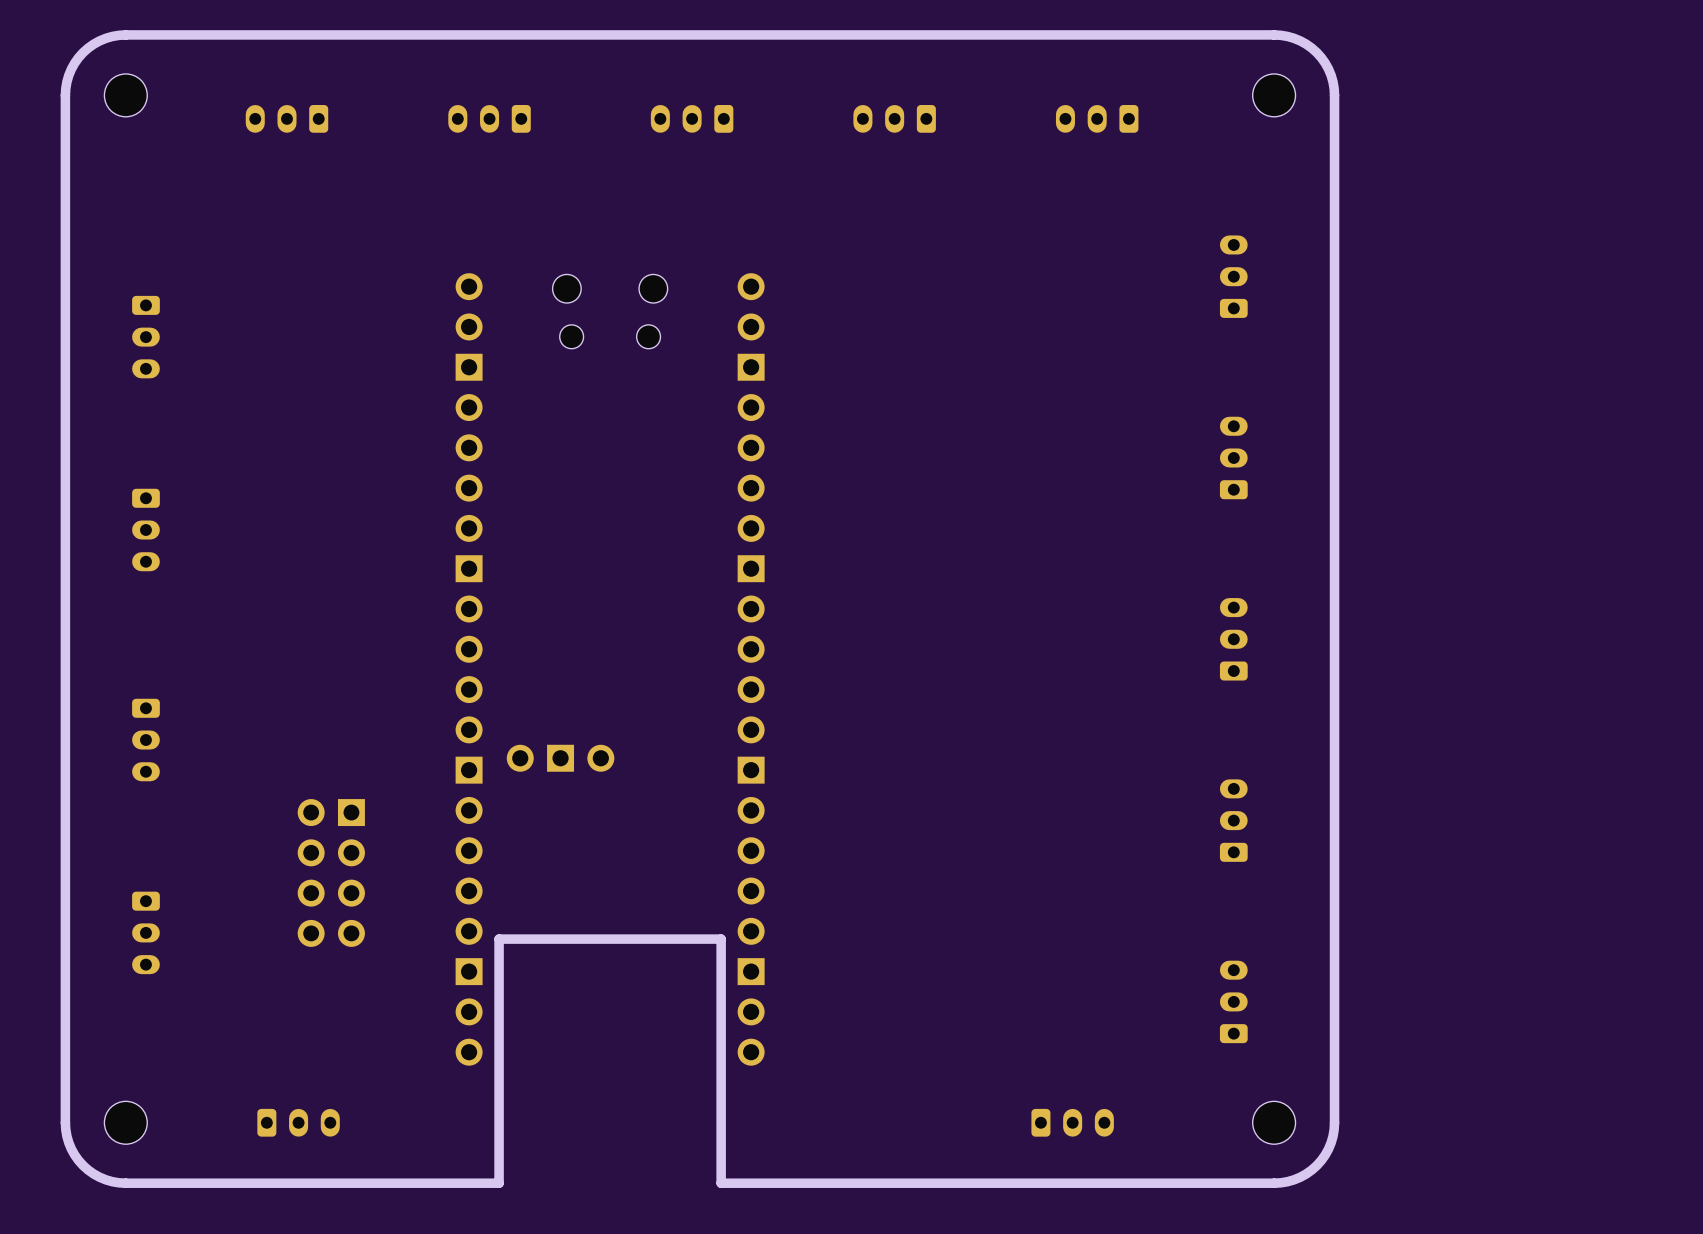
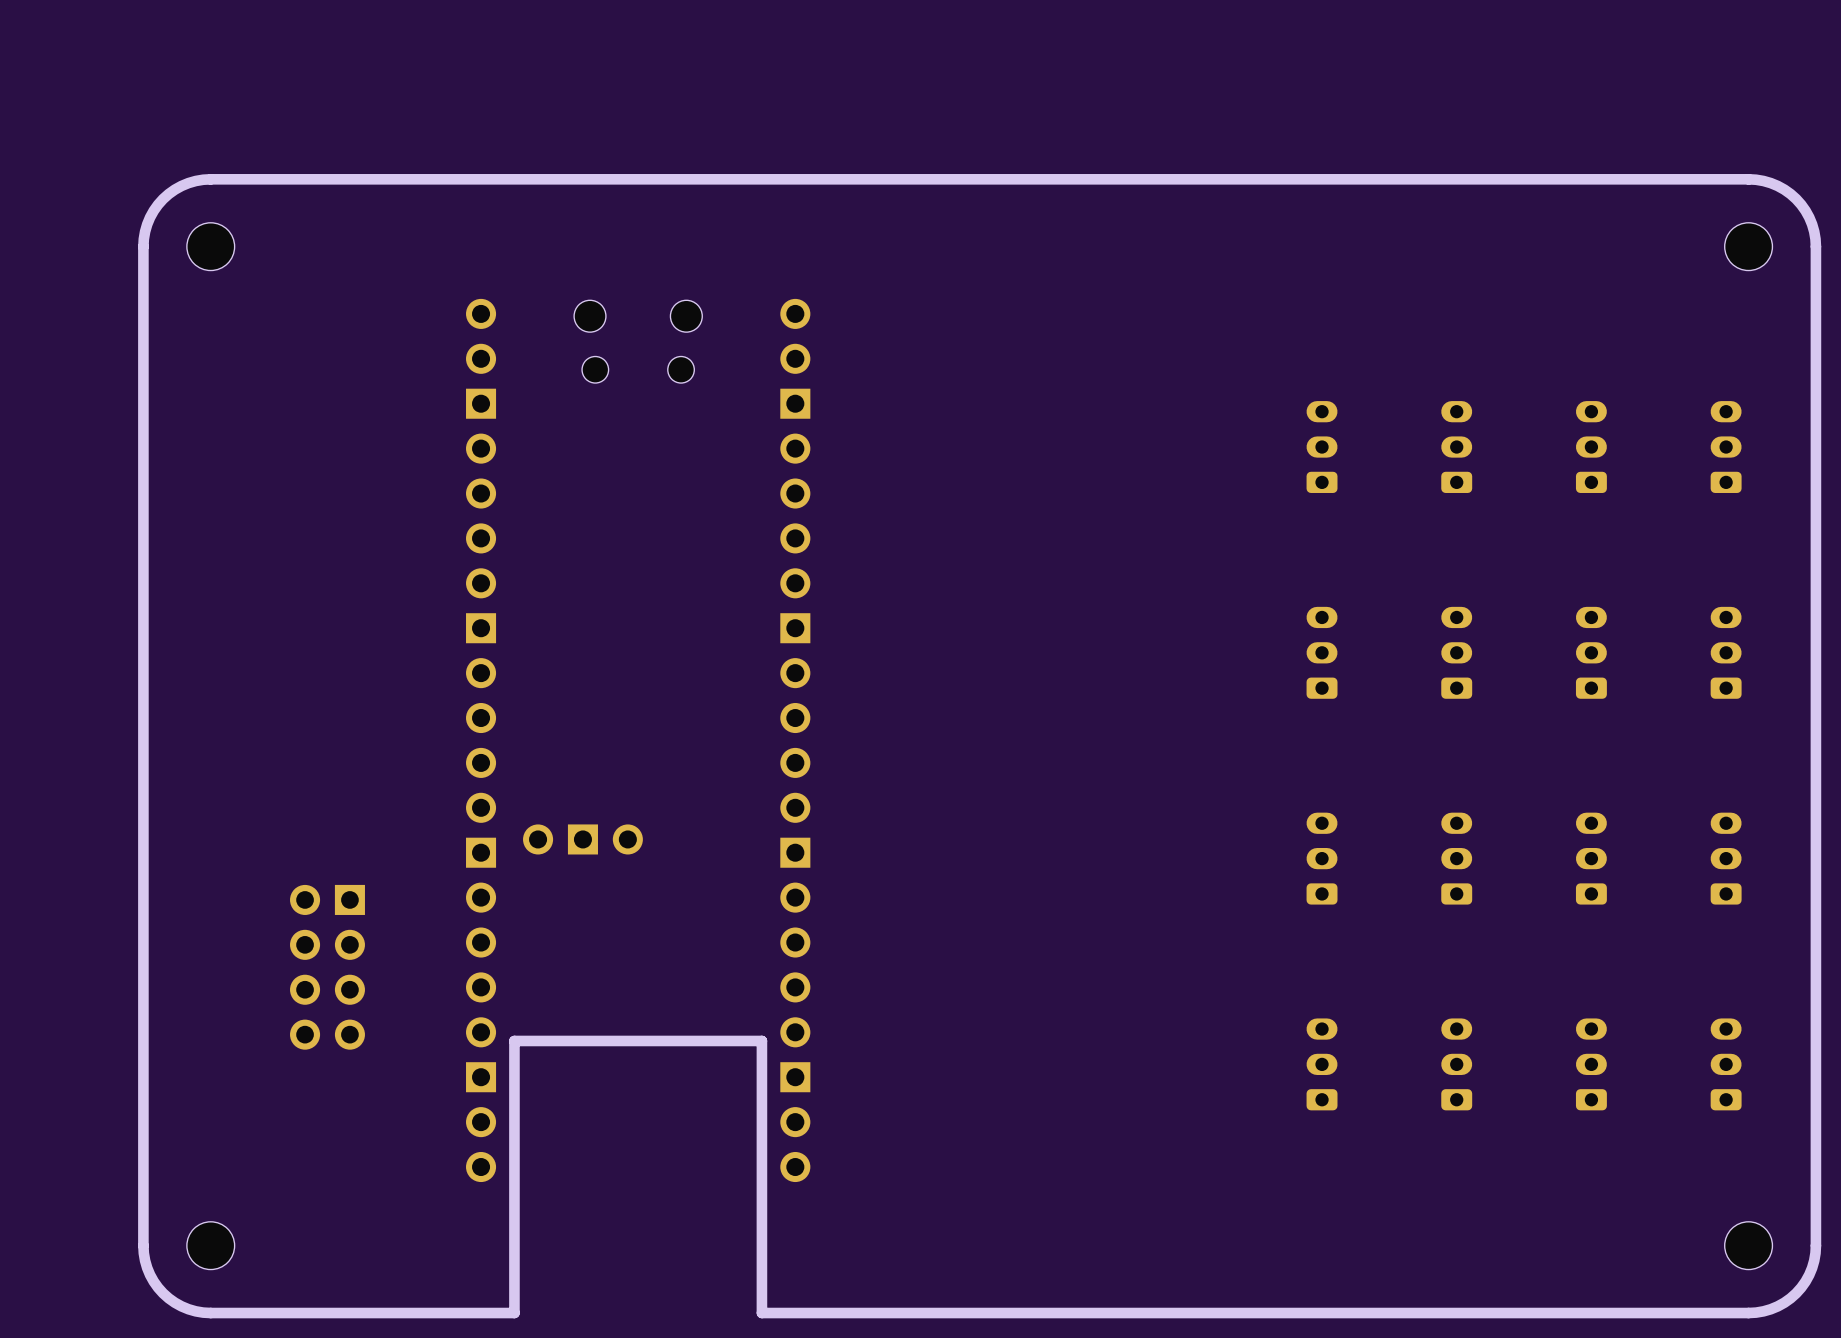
part position: (125, 95) -> (210, 246)
part position: (1274, 95) -> (1748, 246)
part: (286, 118) -> none
part: (489, 118) -> none
part: (692, 118) -> none
part: (894, 118) -> none
part: (1097, 118) -> none
part: (1233, 276) -> none
part: (145, 337) -> none
part: none -> (1456, 447)
part: none -> (1591, 447)
part: none -> (1726, 447)
part position: (1233, 457) -> (1322, 447)
part: (145, 530) -> none
part: none -> (1456, 652)
part: none -> (1591, 652)
part: none -> (1726, 652)
part position: (1233, 639) -> (1322, 652)
part: (145, 740) -> none
part: none -> (1456, 858)
part: none -> (1591, 858)
part: none -> (1726, 858)
part position: (1233, 820) -> (1322, 858)
part: (145, 932) -> none
part: none -> (1456, 1064)
part: none -> (1591, 1064)
part: none -> (1726, 1064)
part position: (1233, 1001) -> (1322, 1064)
part position: (125, 1122) -> (210, 1245)
part: (298, 1122) -> none
part: (1072, 1122) -> none
part position: (1274, 1122) -> (1748, 1245)
board edge: (1274, 1183) (1287, 1181) (1300, 1177) (1316, 1165) (1328, 1149) (1333, 1136) (1334, 1122) (1334, 95) (1333, 81) (1328, 69) (1316, 52) (1306, 44) (1294, 38) (1274, 34) (119, 35) (99, 40) (88, 48) (78, 57) (68, 75) (65, 95) (65, 1129) (71, 1149) (78, 1160) (88, 1170) (105, 1179) (125, 1183) (226, 1183) -> (1378, 1313) (1756, 1312) (1770, 1309) (1790, 1298) (1805, 1281) (1812, 1267) (1815, 1245) (1815, 246) (1812, 224) (1801, 204) (1790, 194) (1770, 183) (1748, 179) (210, 179) (188, 183) (168, 194) (158, 204) (150, 217) (145, 231) (143, 246) (143, 1245) (145, 1260) (150, 1274) (163, 1293) (181, 1306) (195, 1311) (210, 1313)

